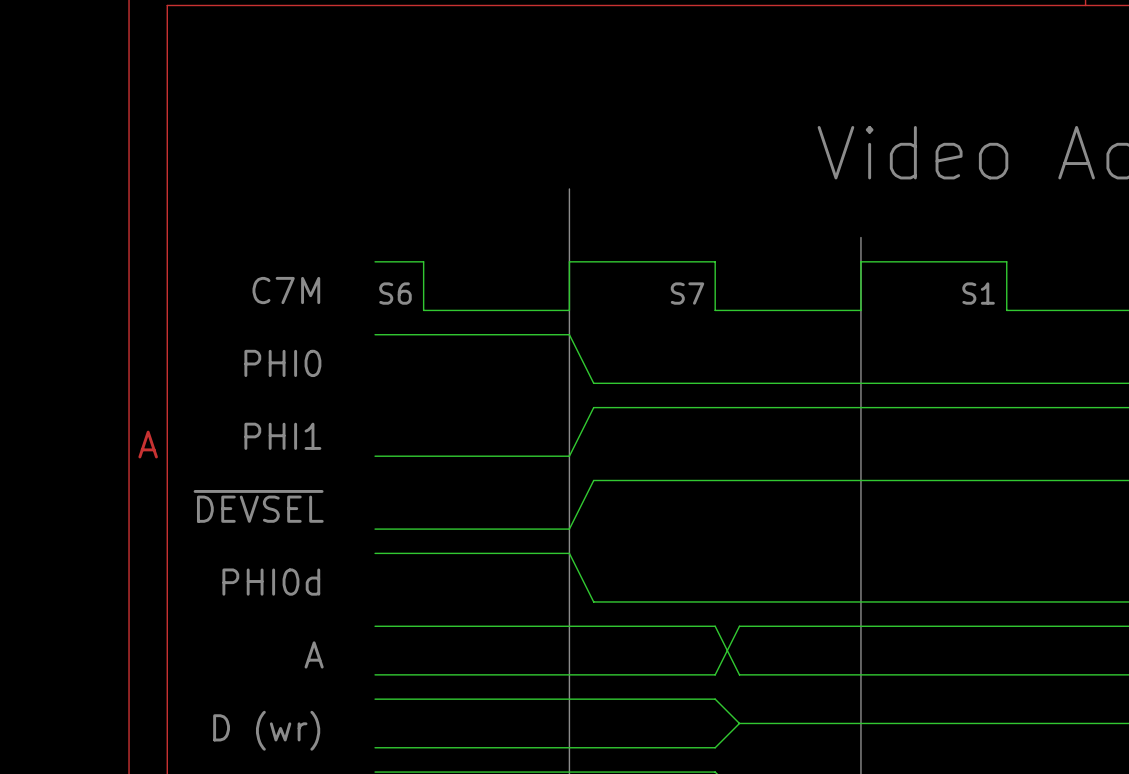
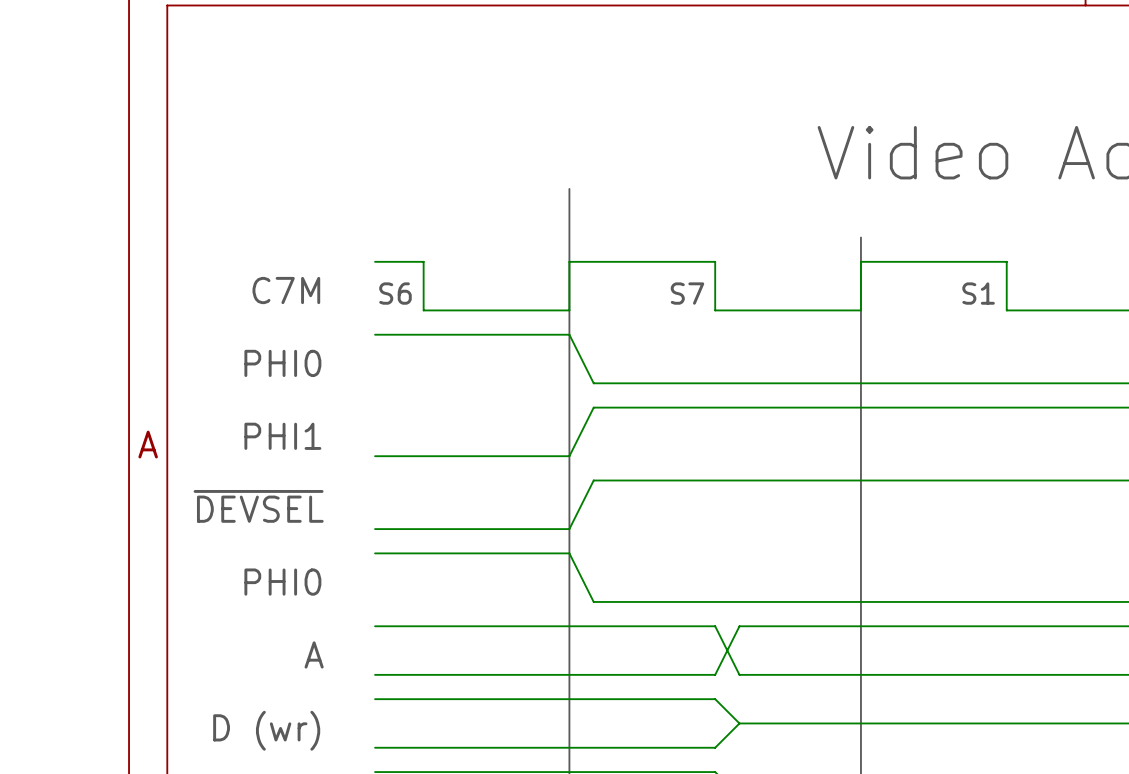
text: PHI0d (271, 582) -> PHI0 (282, 582)

